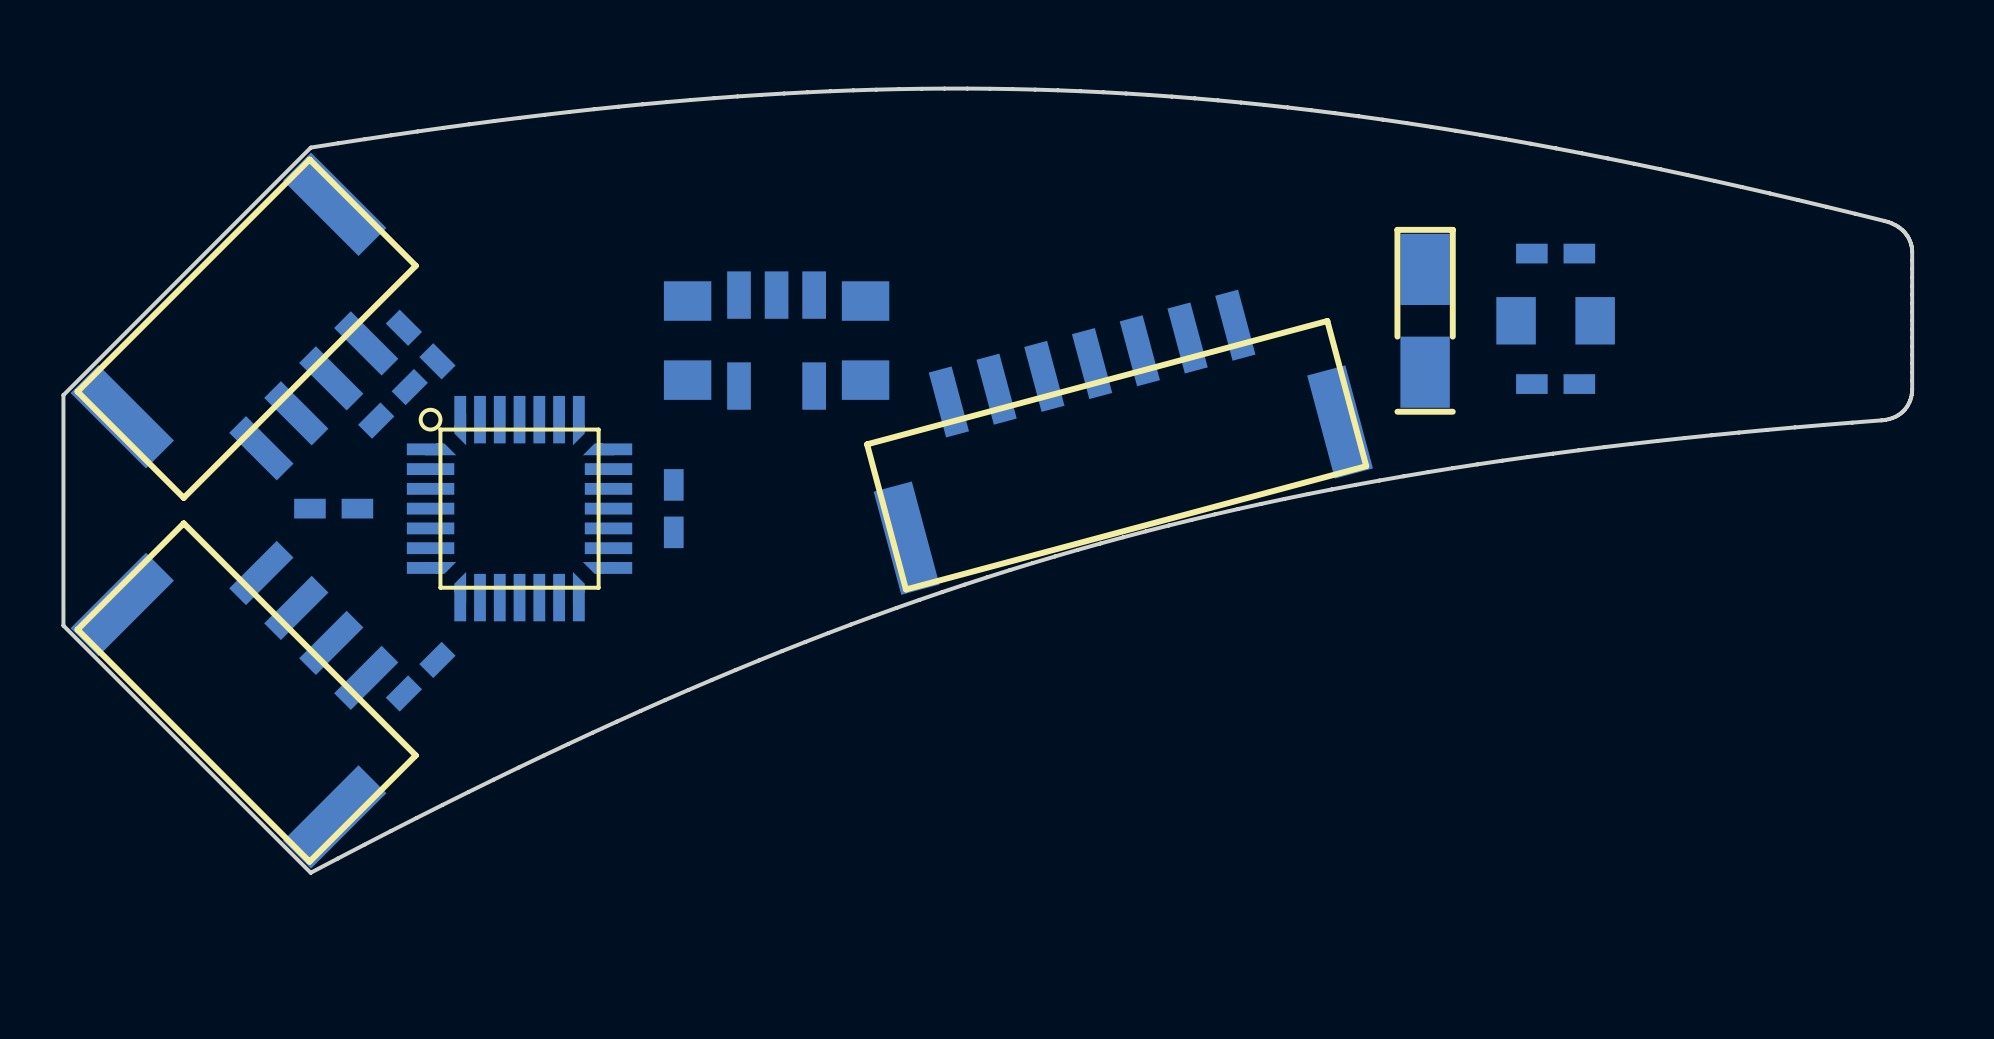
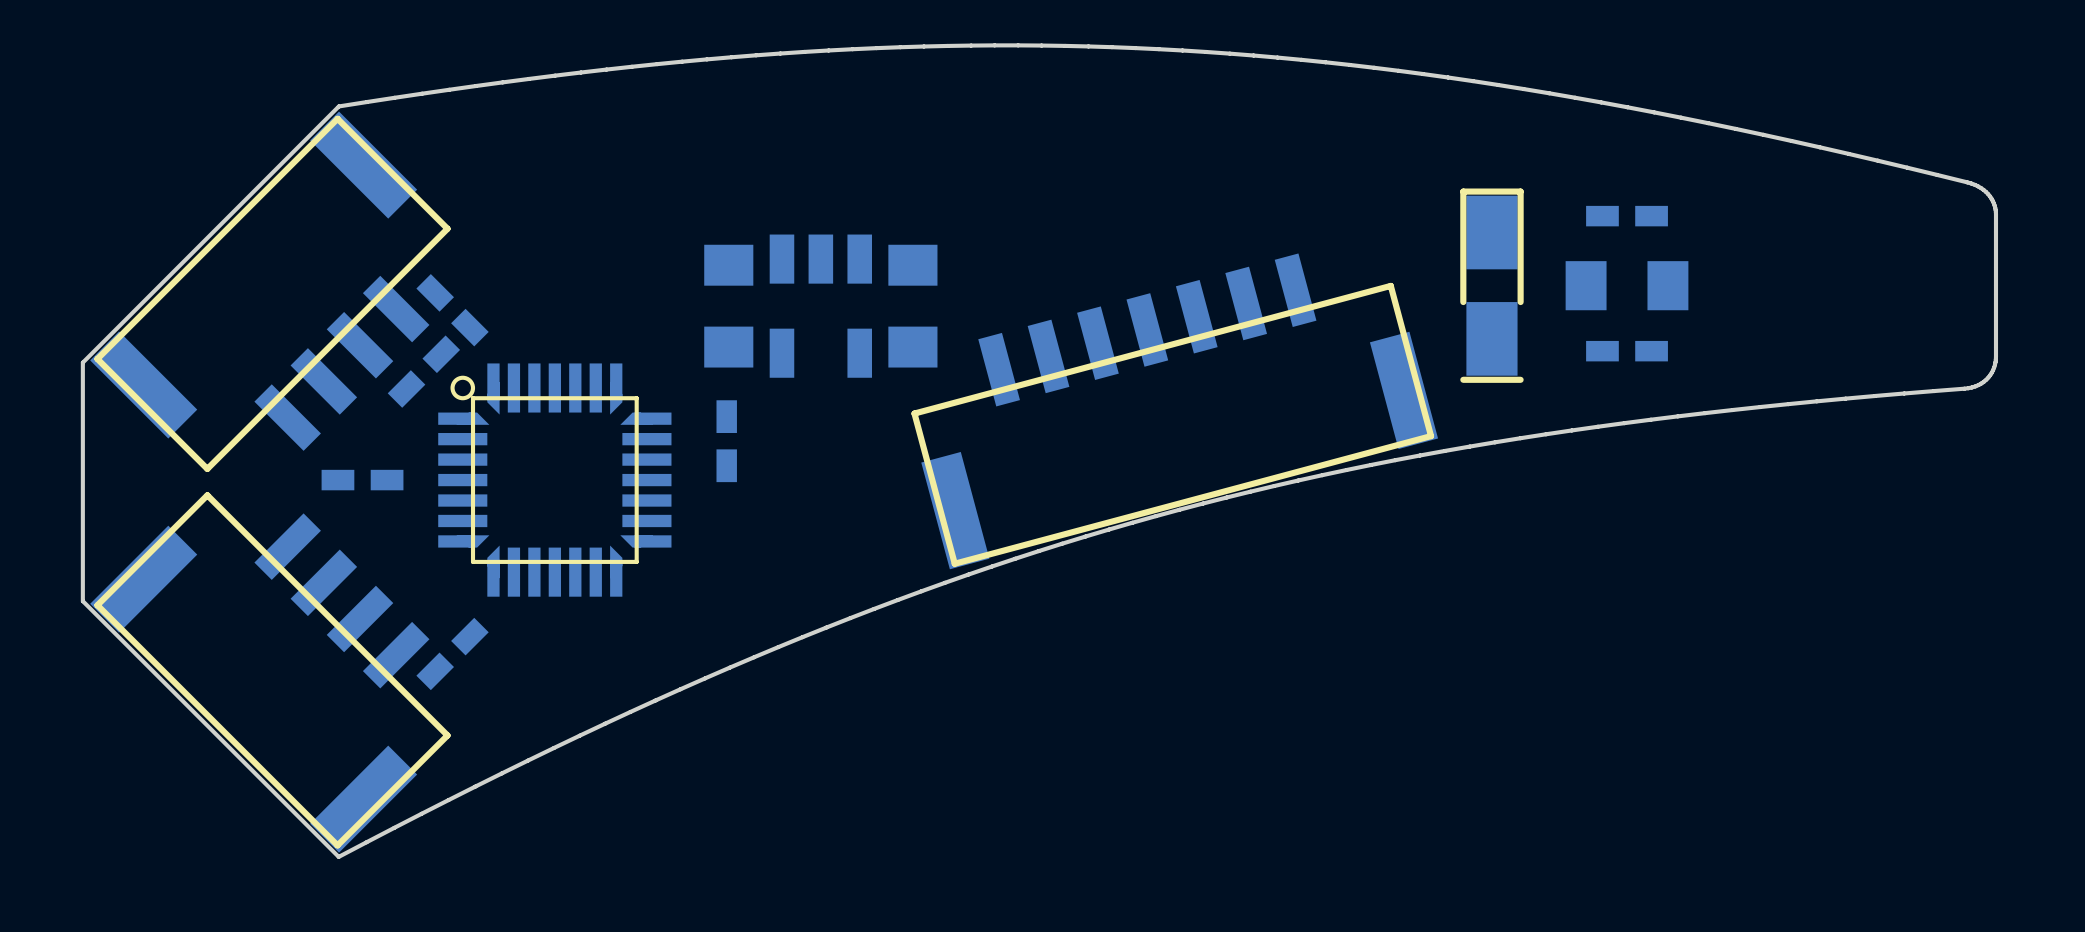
part position: (673, 508) -> (726, 441)

